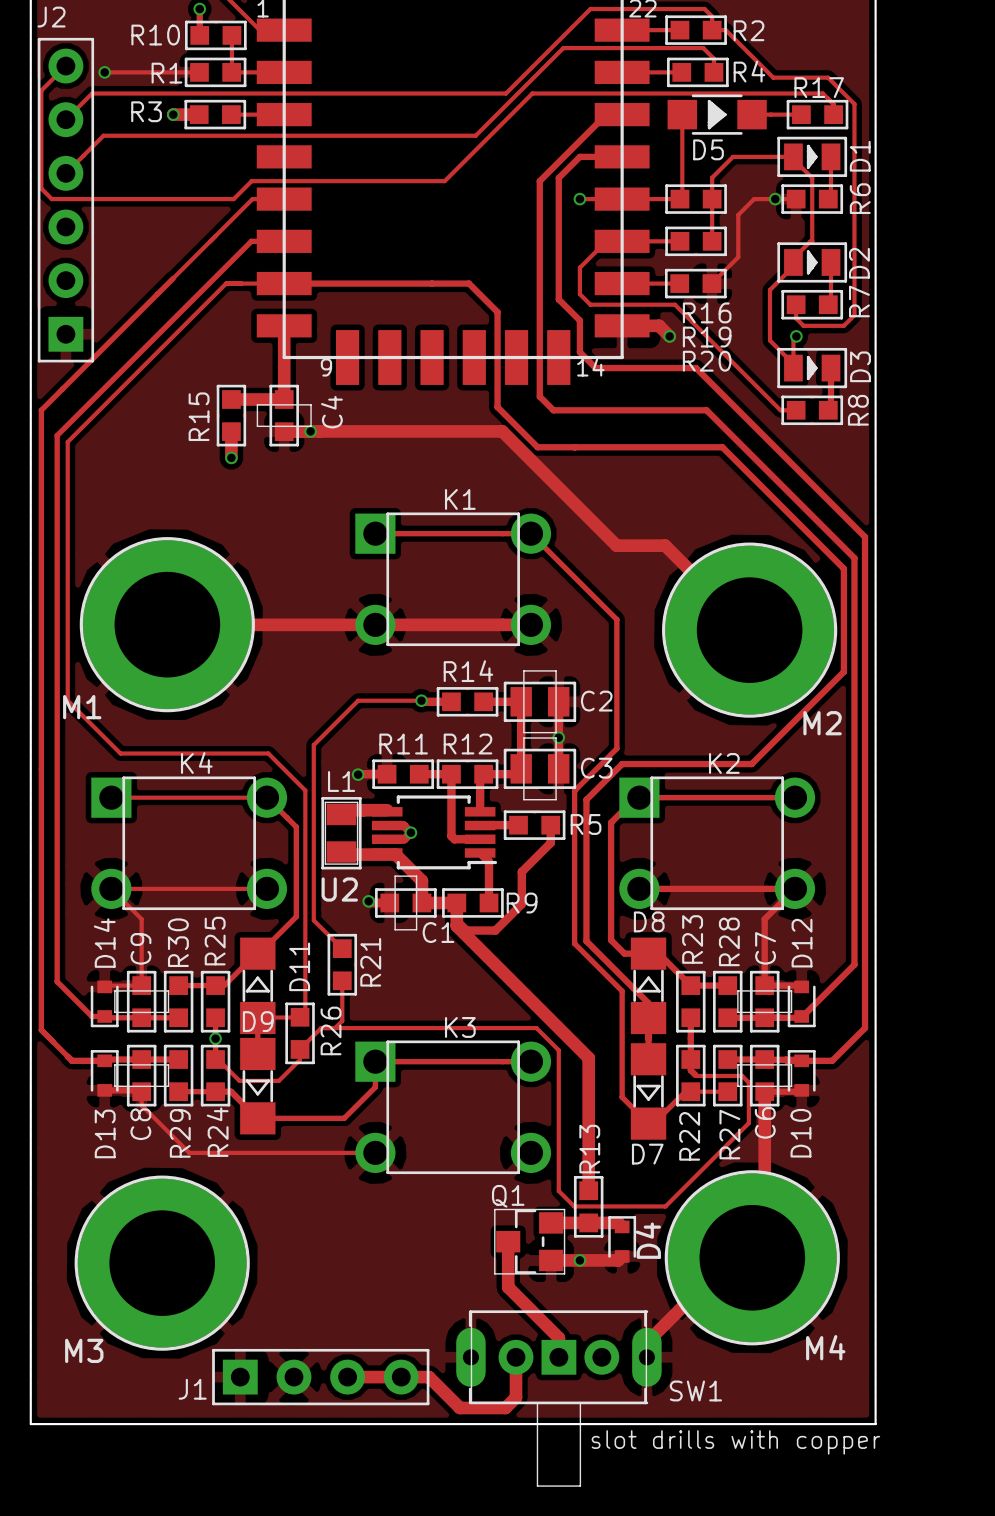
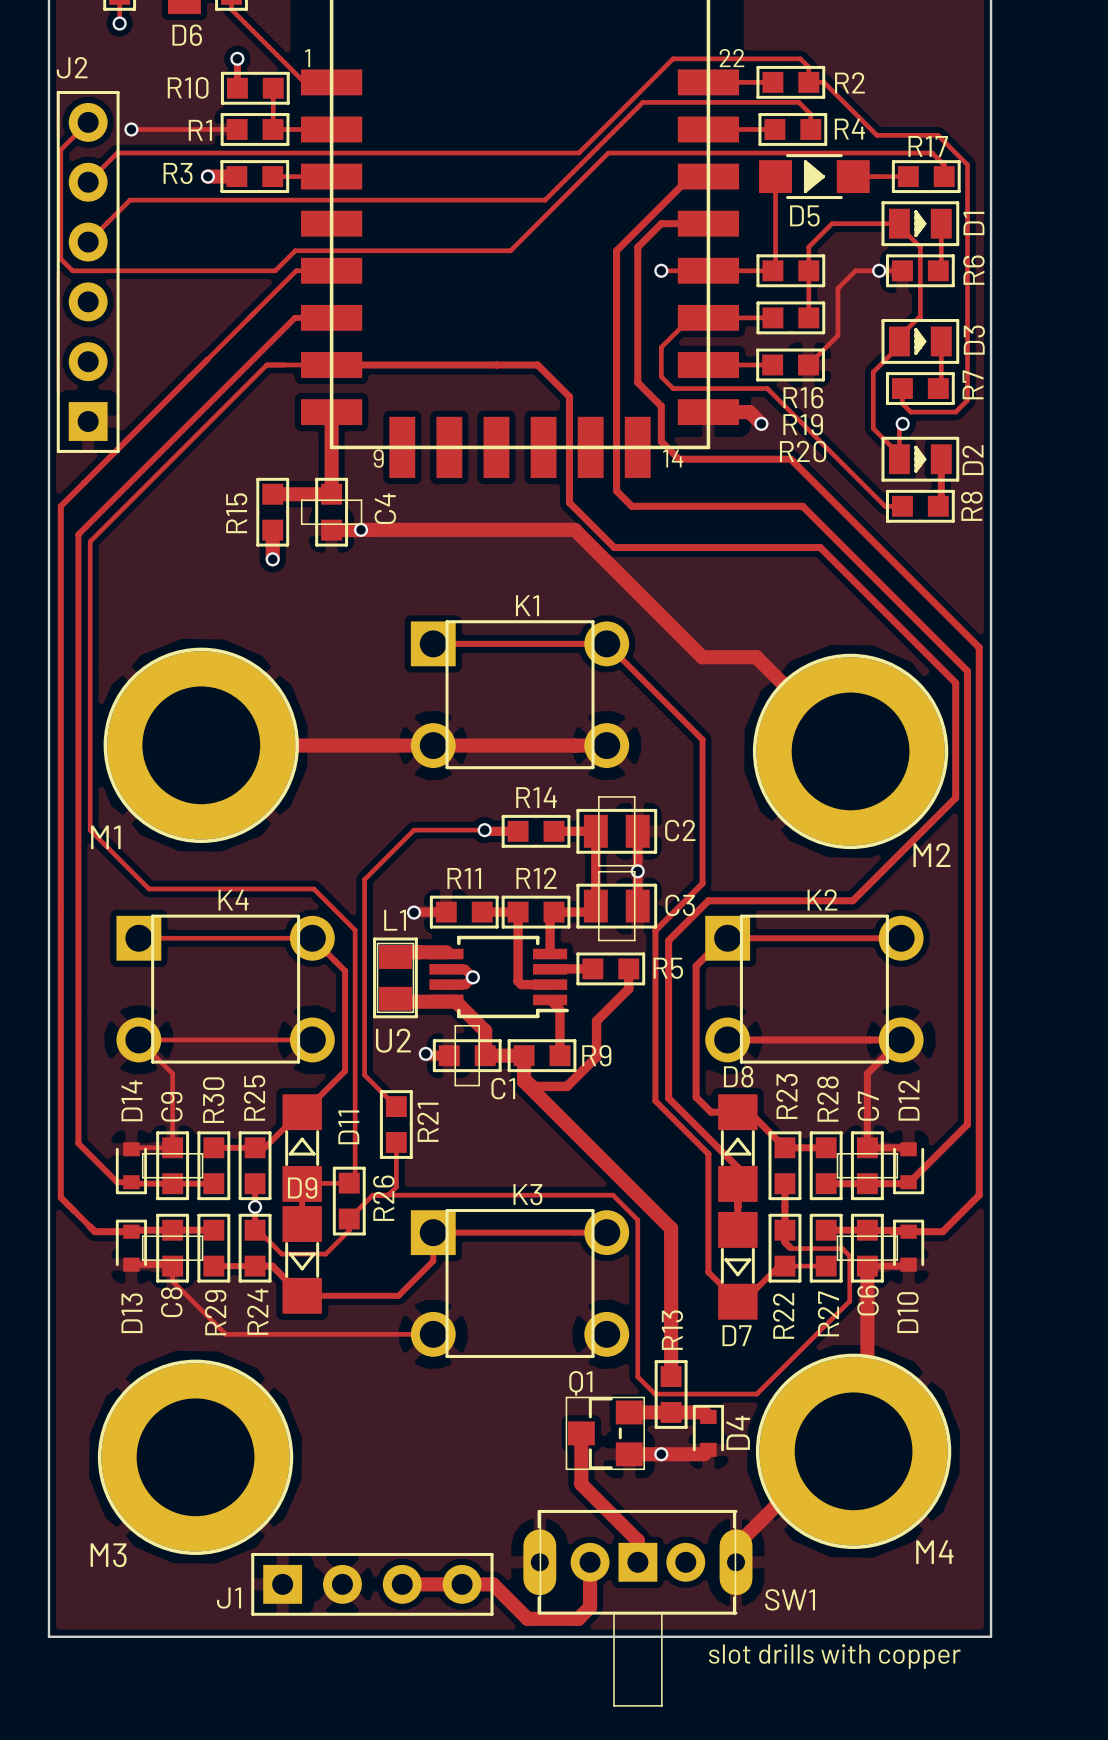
D2 name: D2 (859, 263) -> D3 (974, 340)
D3 name: D3 (860, 366) -> D2 (972, 460)

